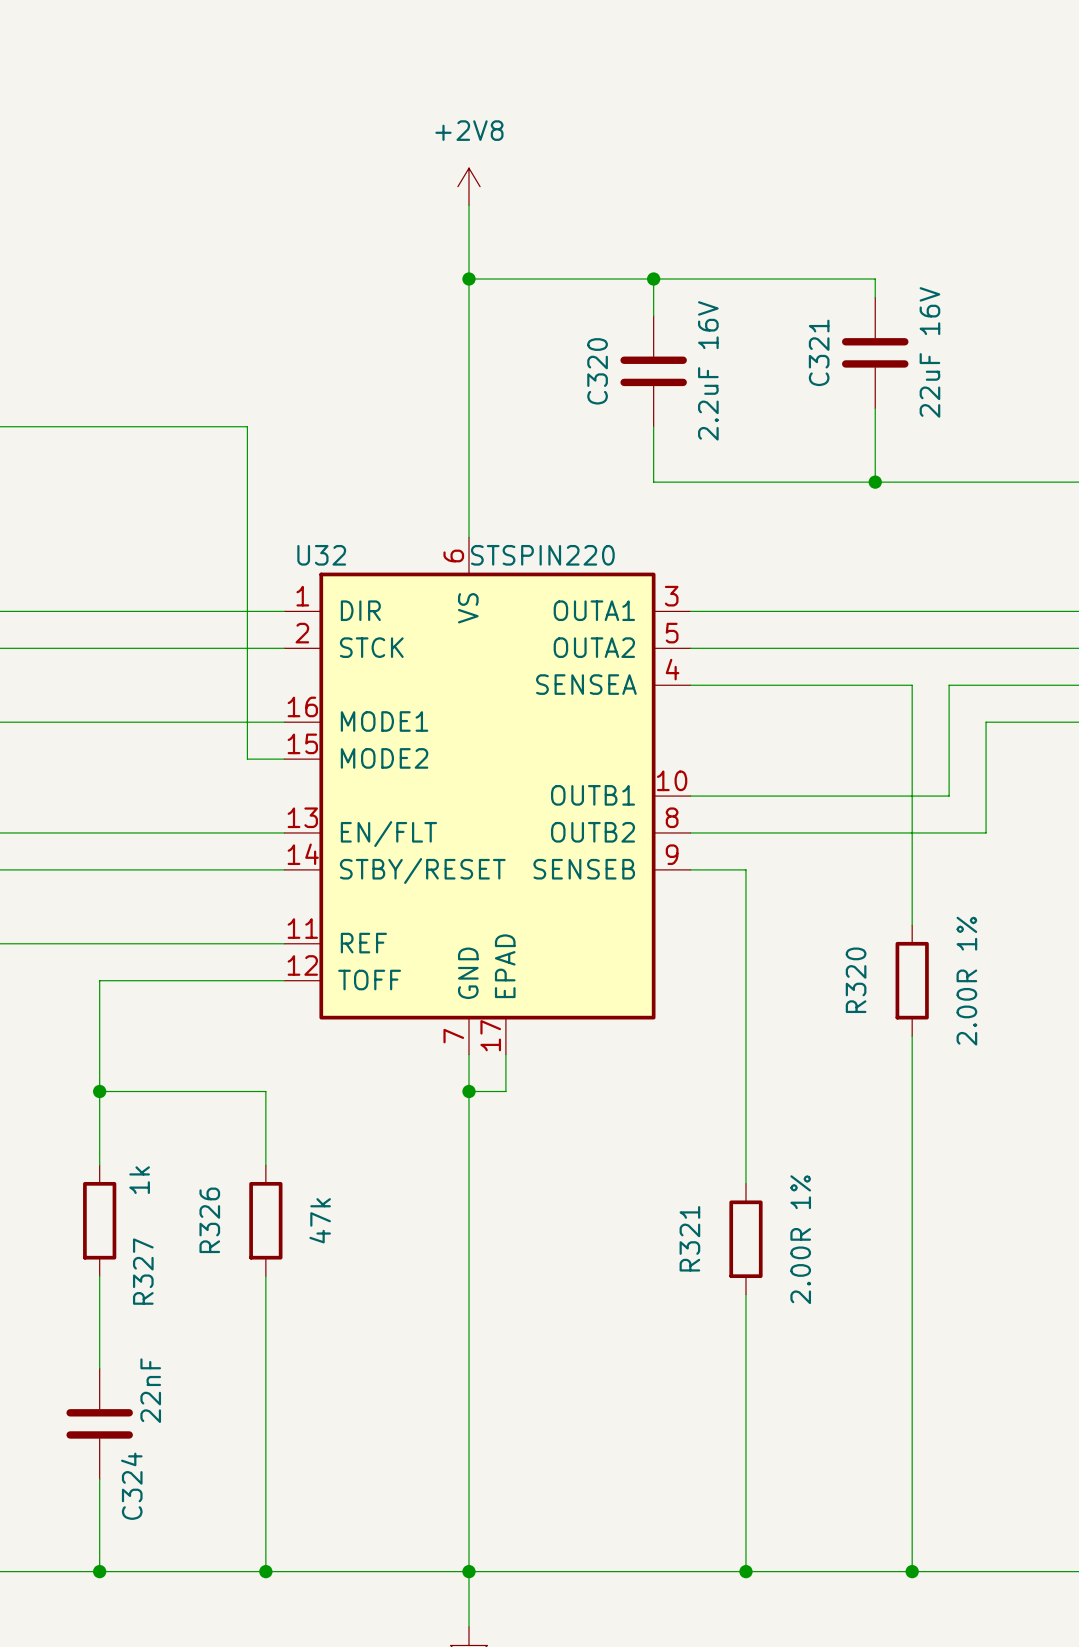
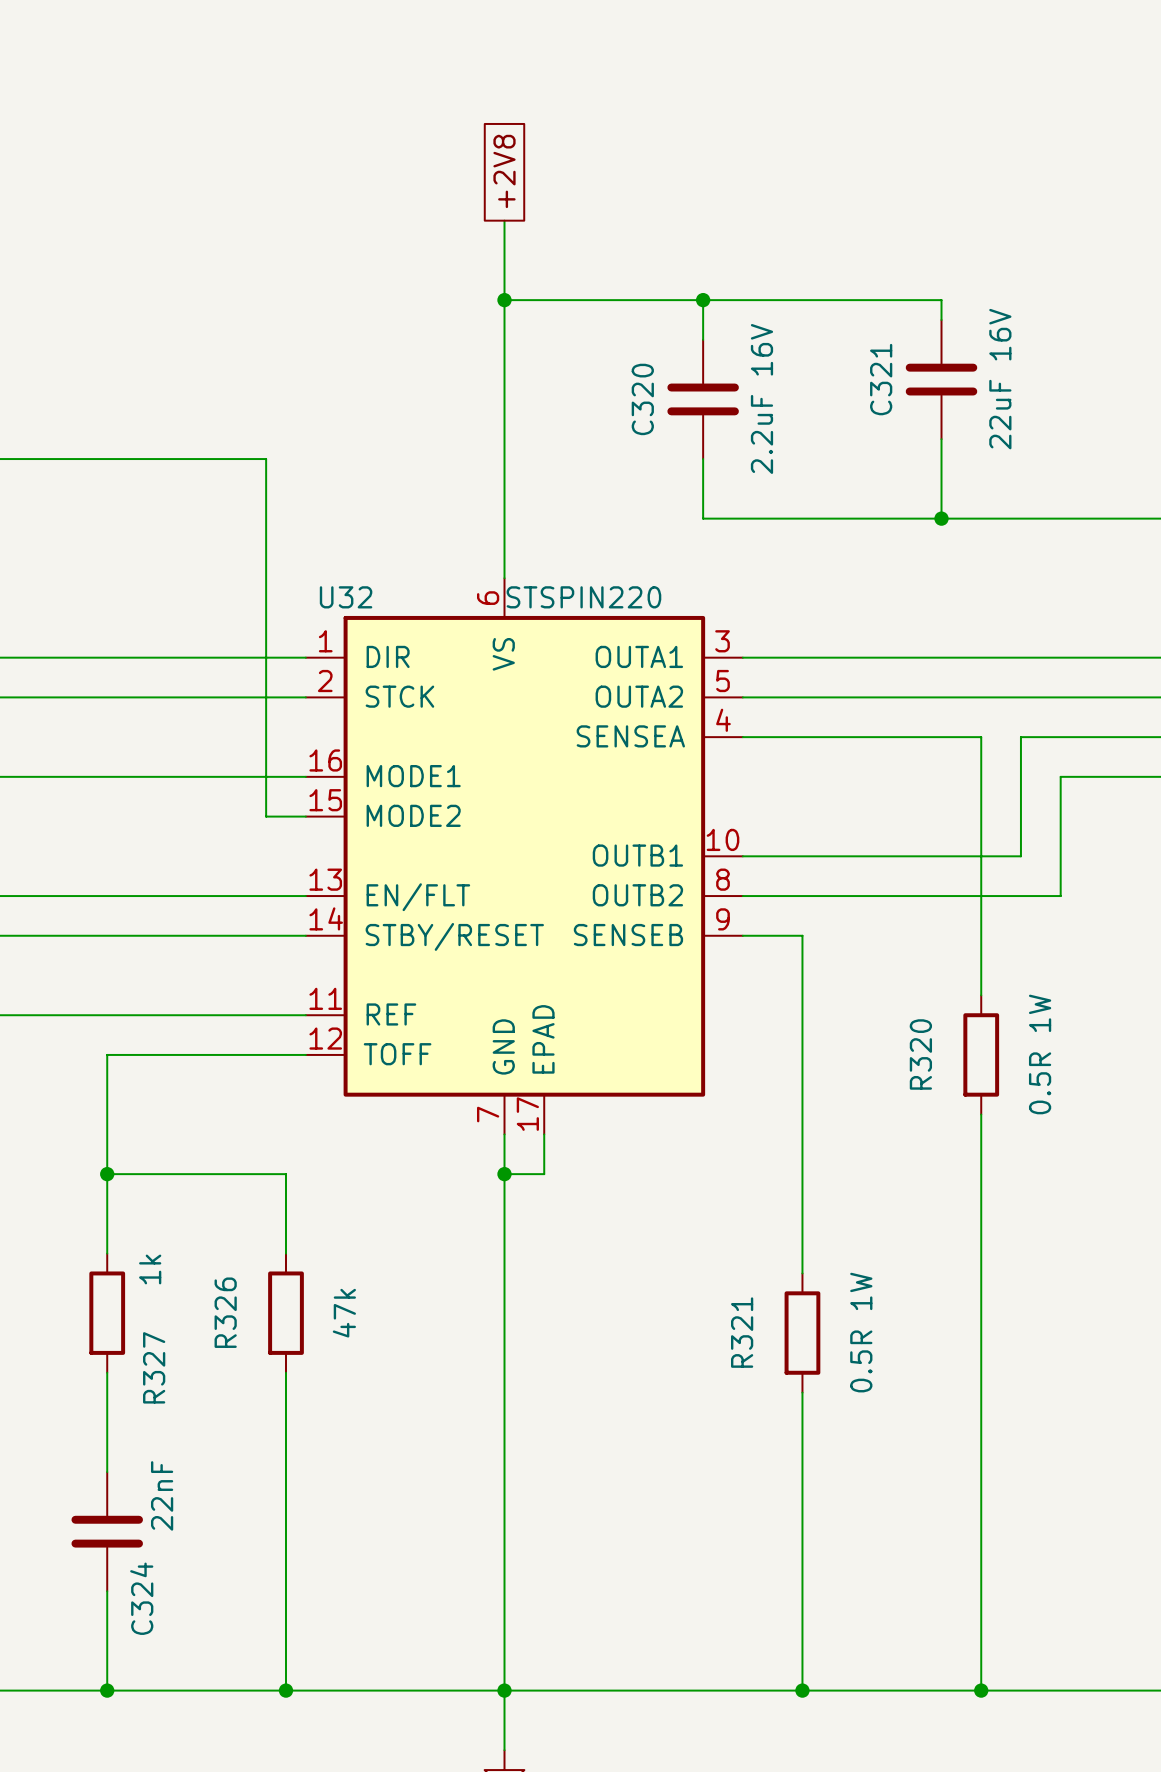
global label: none -> +2V8 (504, 171)
power symbol: +2V8 (468, 186) -> none
R320 value: 2.00R 1% (966, 981) -> 0.5R 1W (1040, 1054)
R321 value: 2.00R 1% (800, 1239) -> 0.5R 1W (861, 1332)

